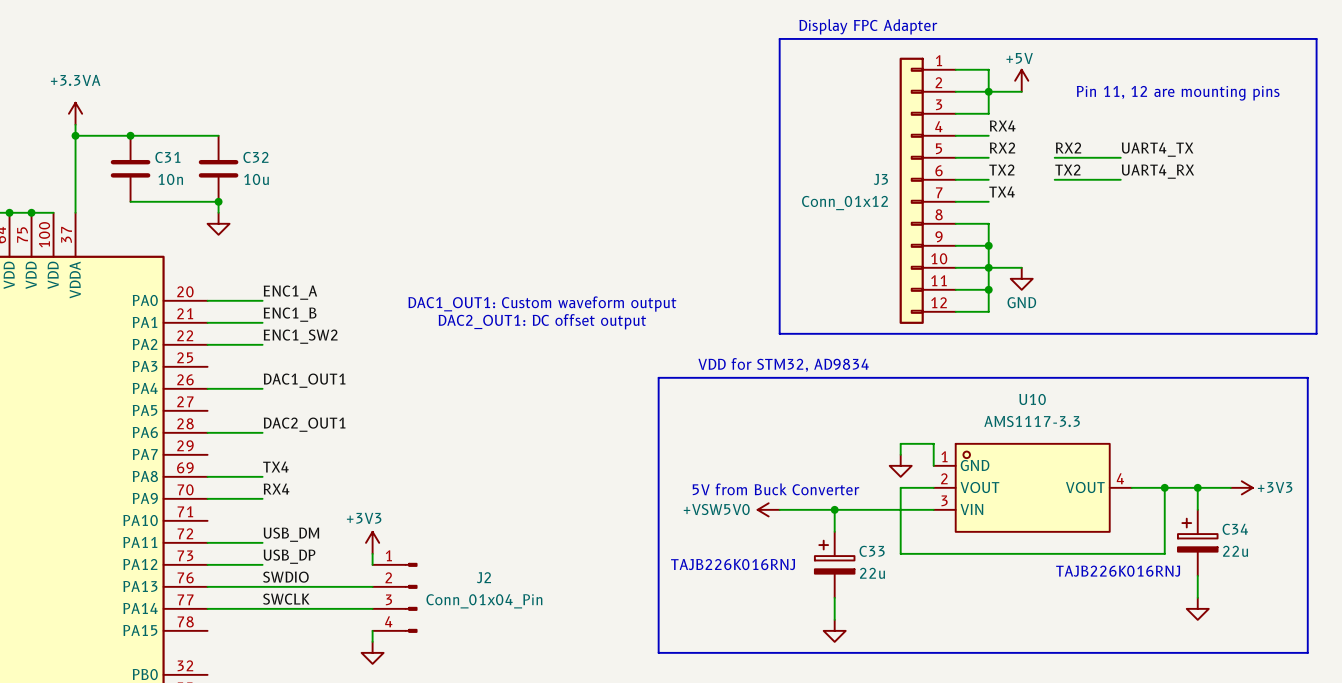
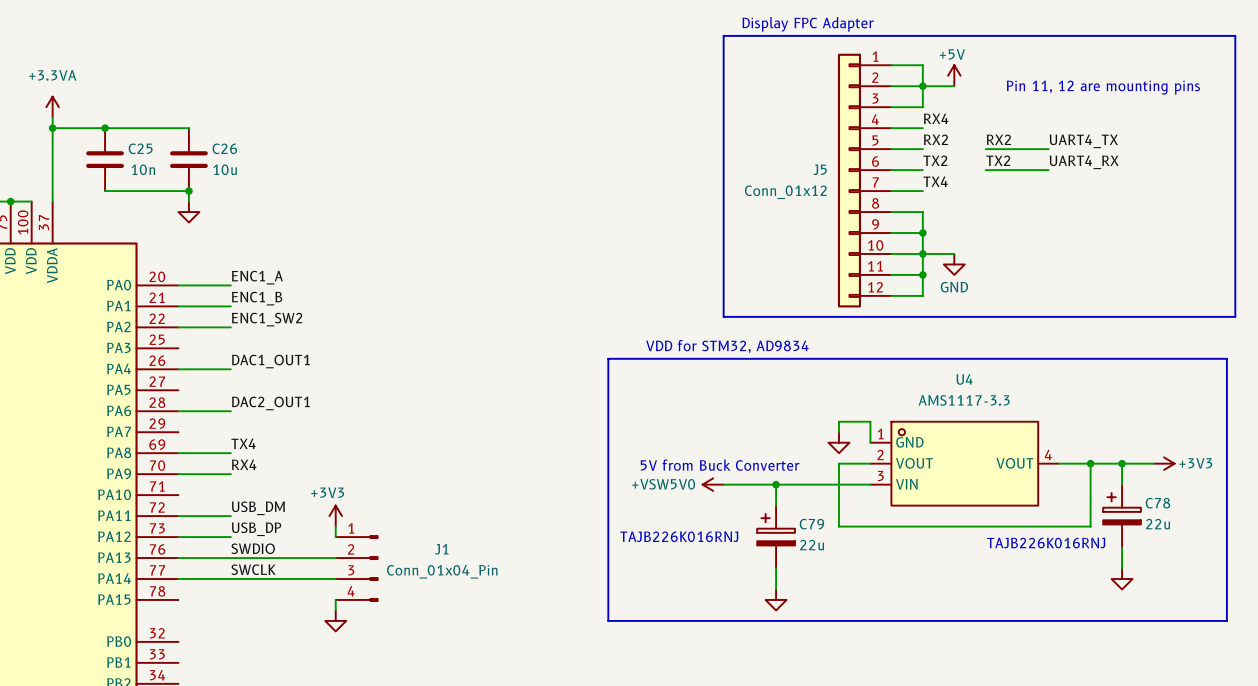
C31 name: C31 (167, 157) -> C25 (140, 148)
C32 name: C32 (255, 157) -> C26 (224, 148)
J3 name: J3 (880, 179) -> J5 (820, 169)
text: DAC1_OUT1: Custom waveform output (542, 304) -> none
text: DAC2_OUT1: DC offset output (542, 321) -> none
U10 name: U10 (1032, 399) -> U4 (964, 379)
C34 name: C34 (1235, 529) -> C78 (1157, 503)
C33 name: C33 (872, 551) -> C79 (811, 524)
J2 name: J2 (483, 577) -> J1 (441, 549)

